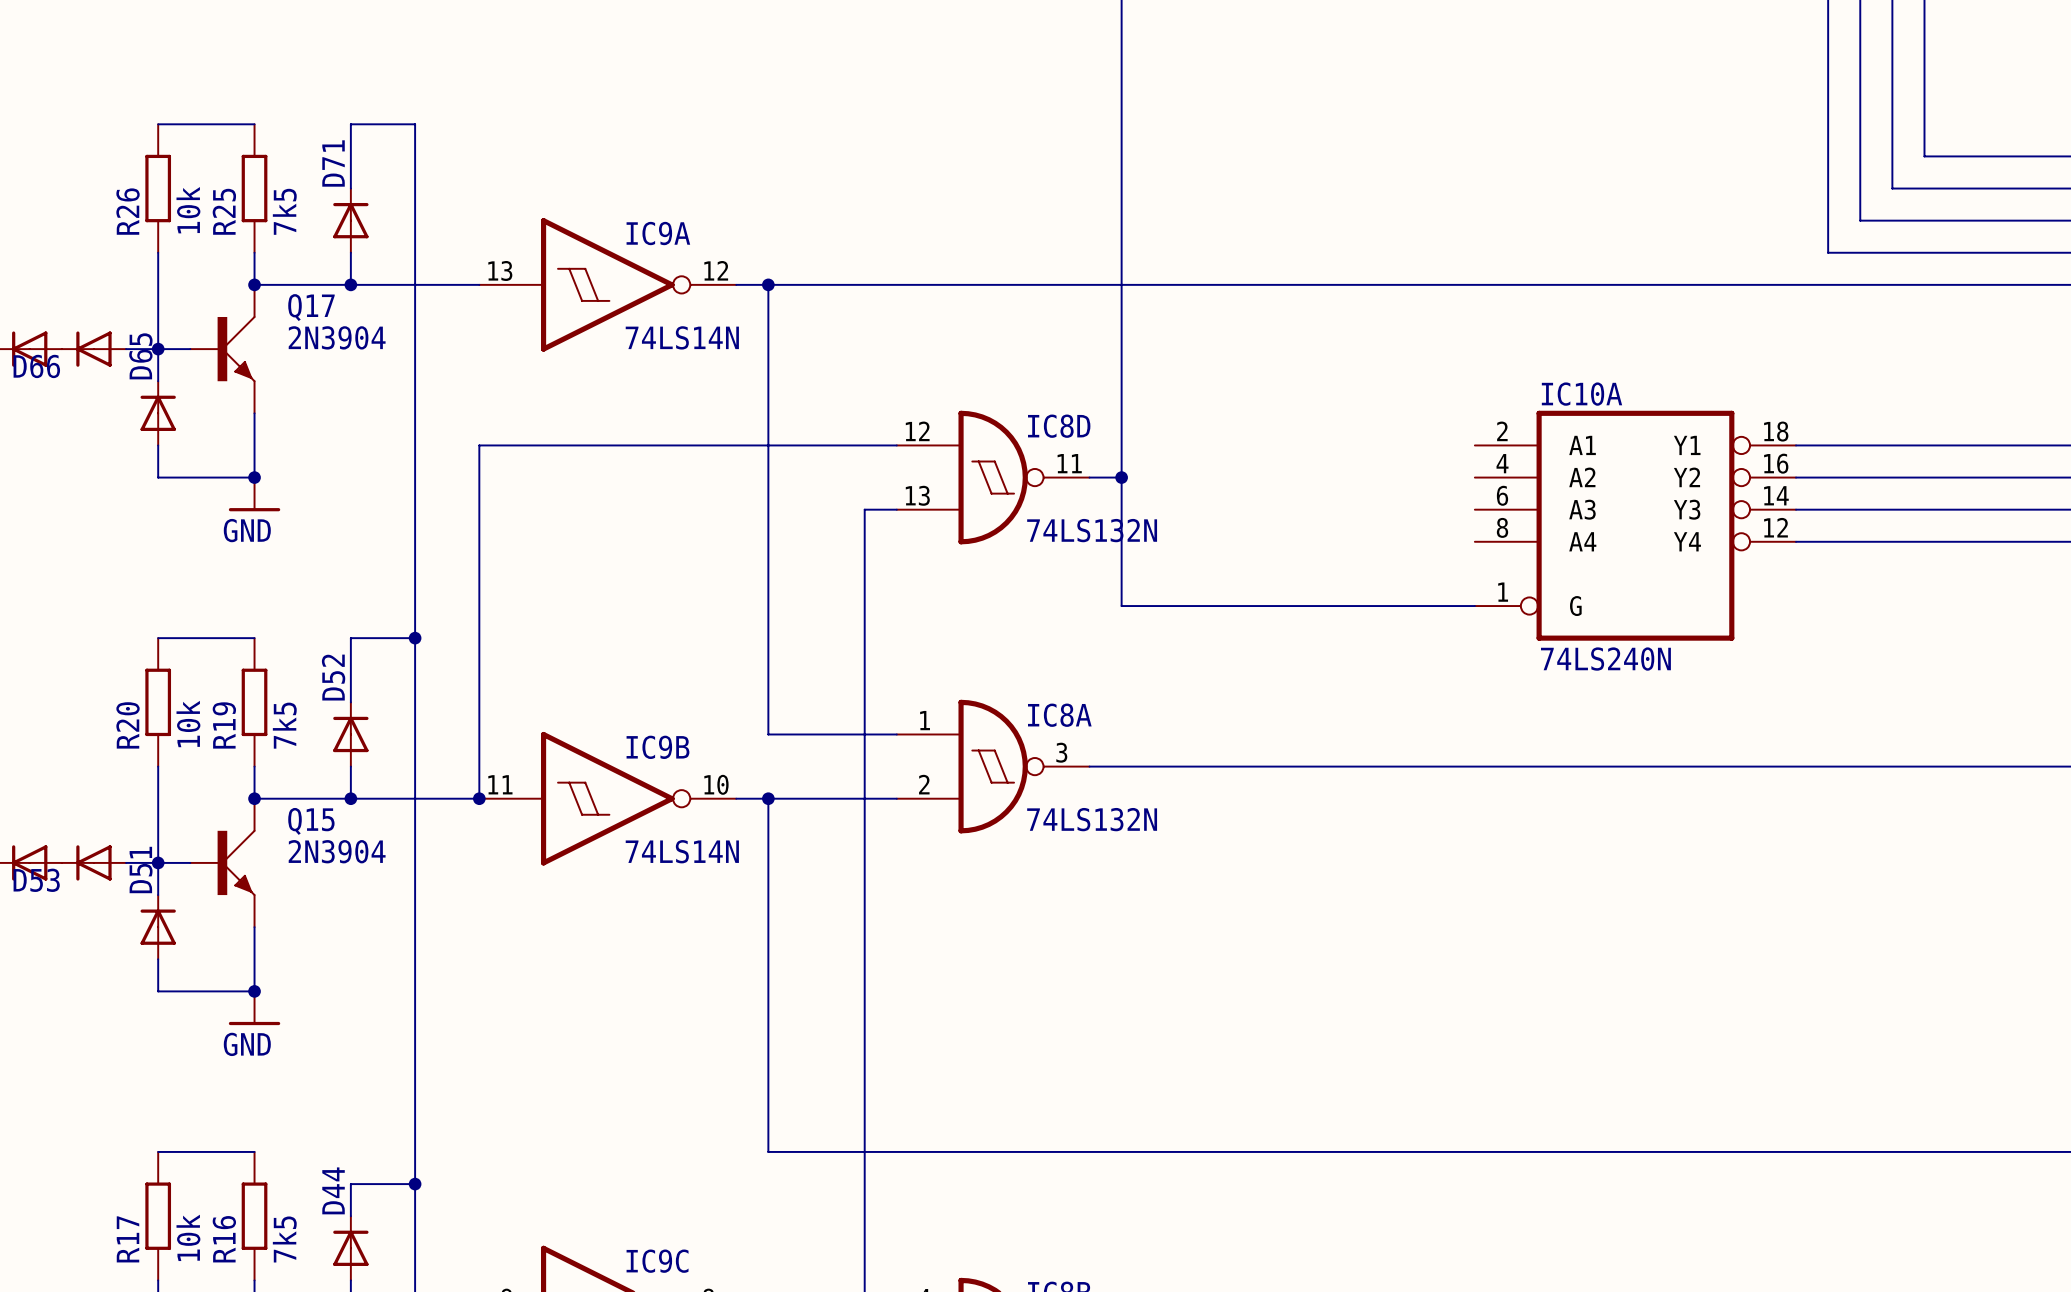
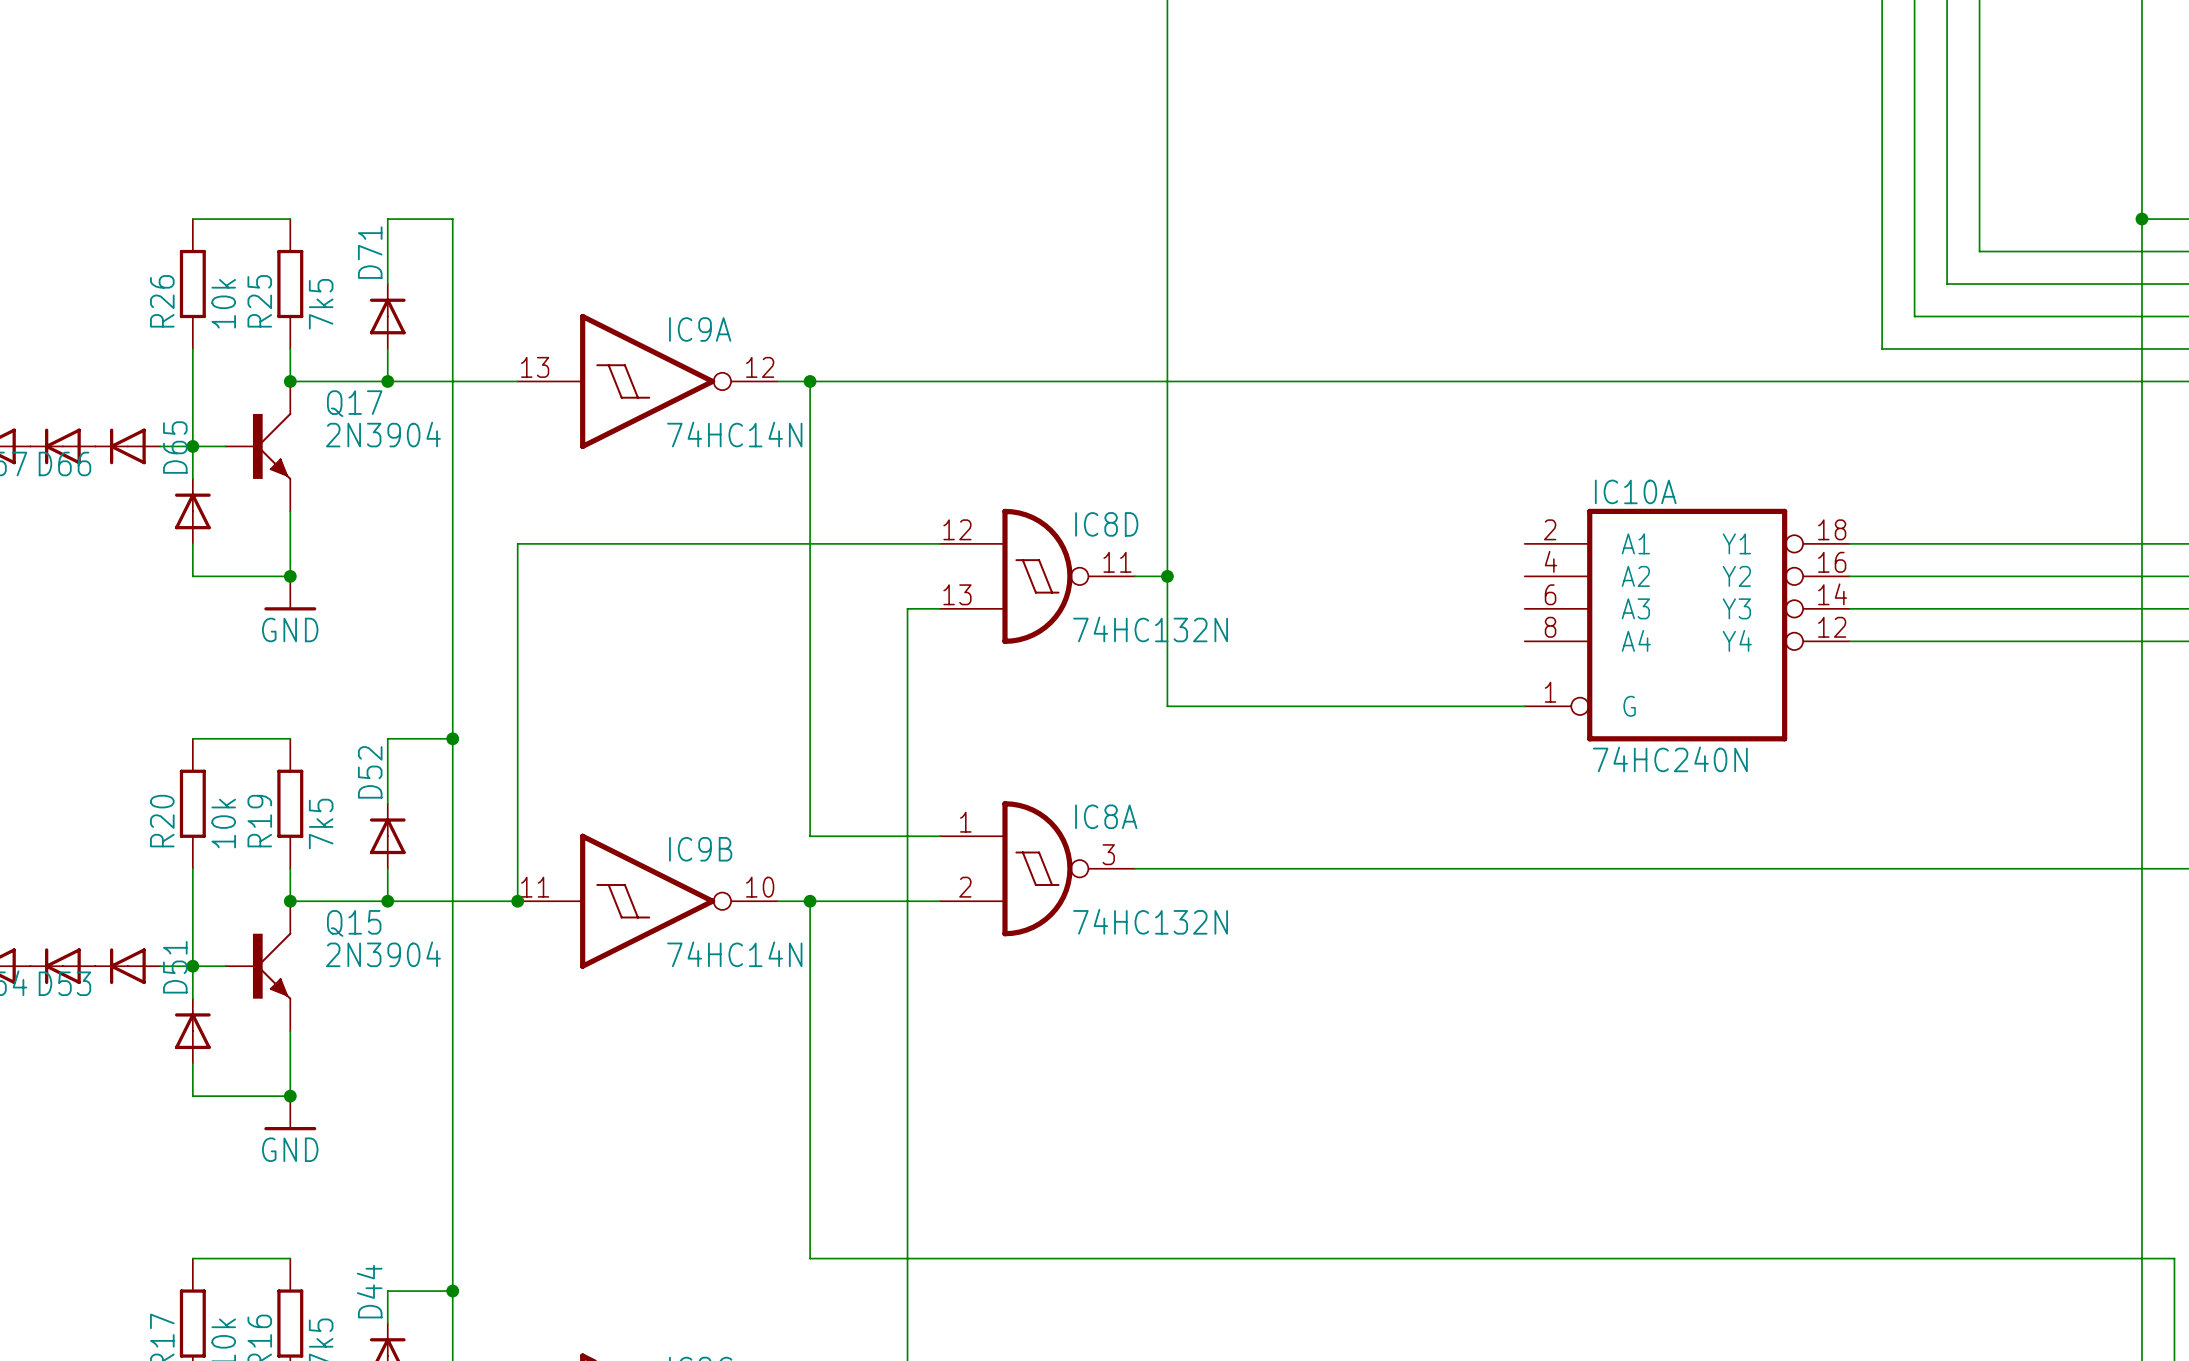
IC9A value: 74LS14N (682, 337) -> 74HC14N (734, 434)
IC8D value: 74LS132N (1092, 530) -> 74HC132N (1150, 629)
IC10A value: 74LS240N (1605, 659) -> 74HC240N (1670, 759)
IC8A value: 74LS132N (1092, 819) -> 74HC132N (1150, 921)
IC9B value: 74LS14N (682, 851) -> 74HC14N (734, 954)

